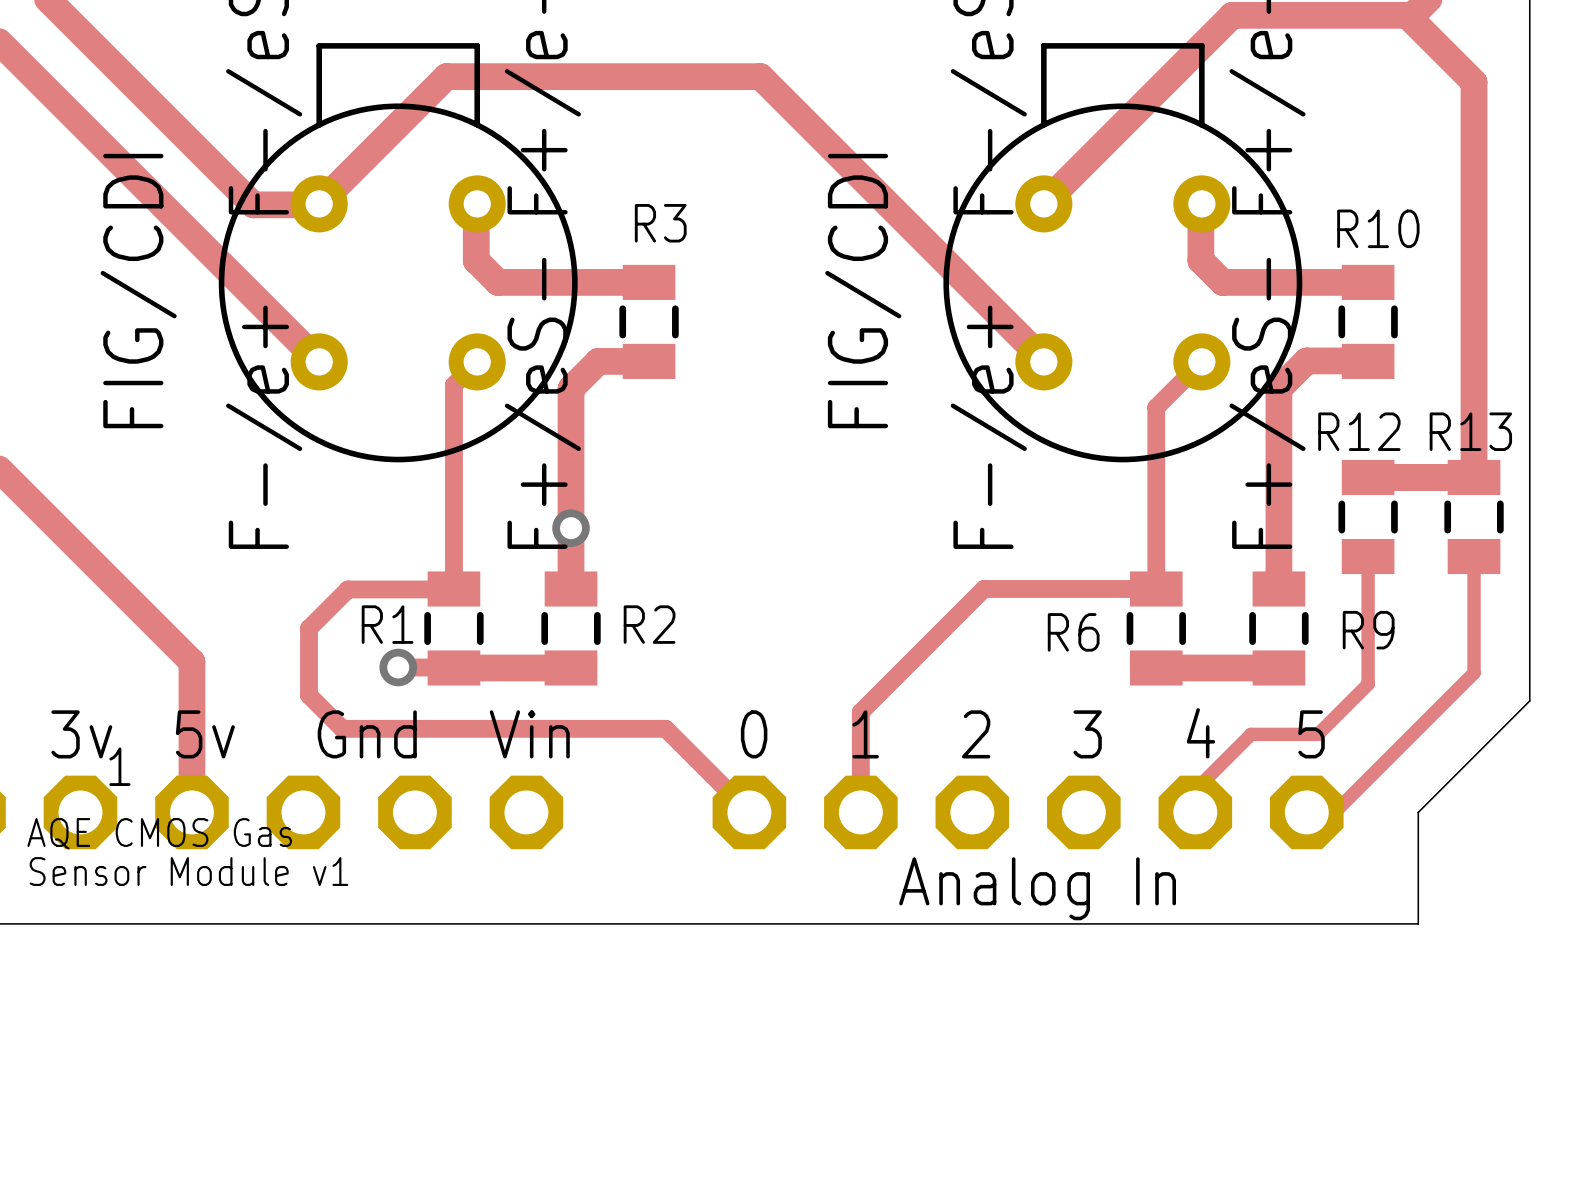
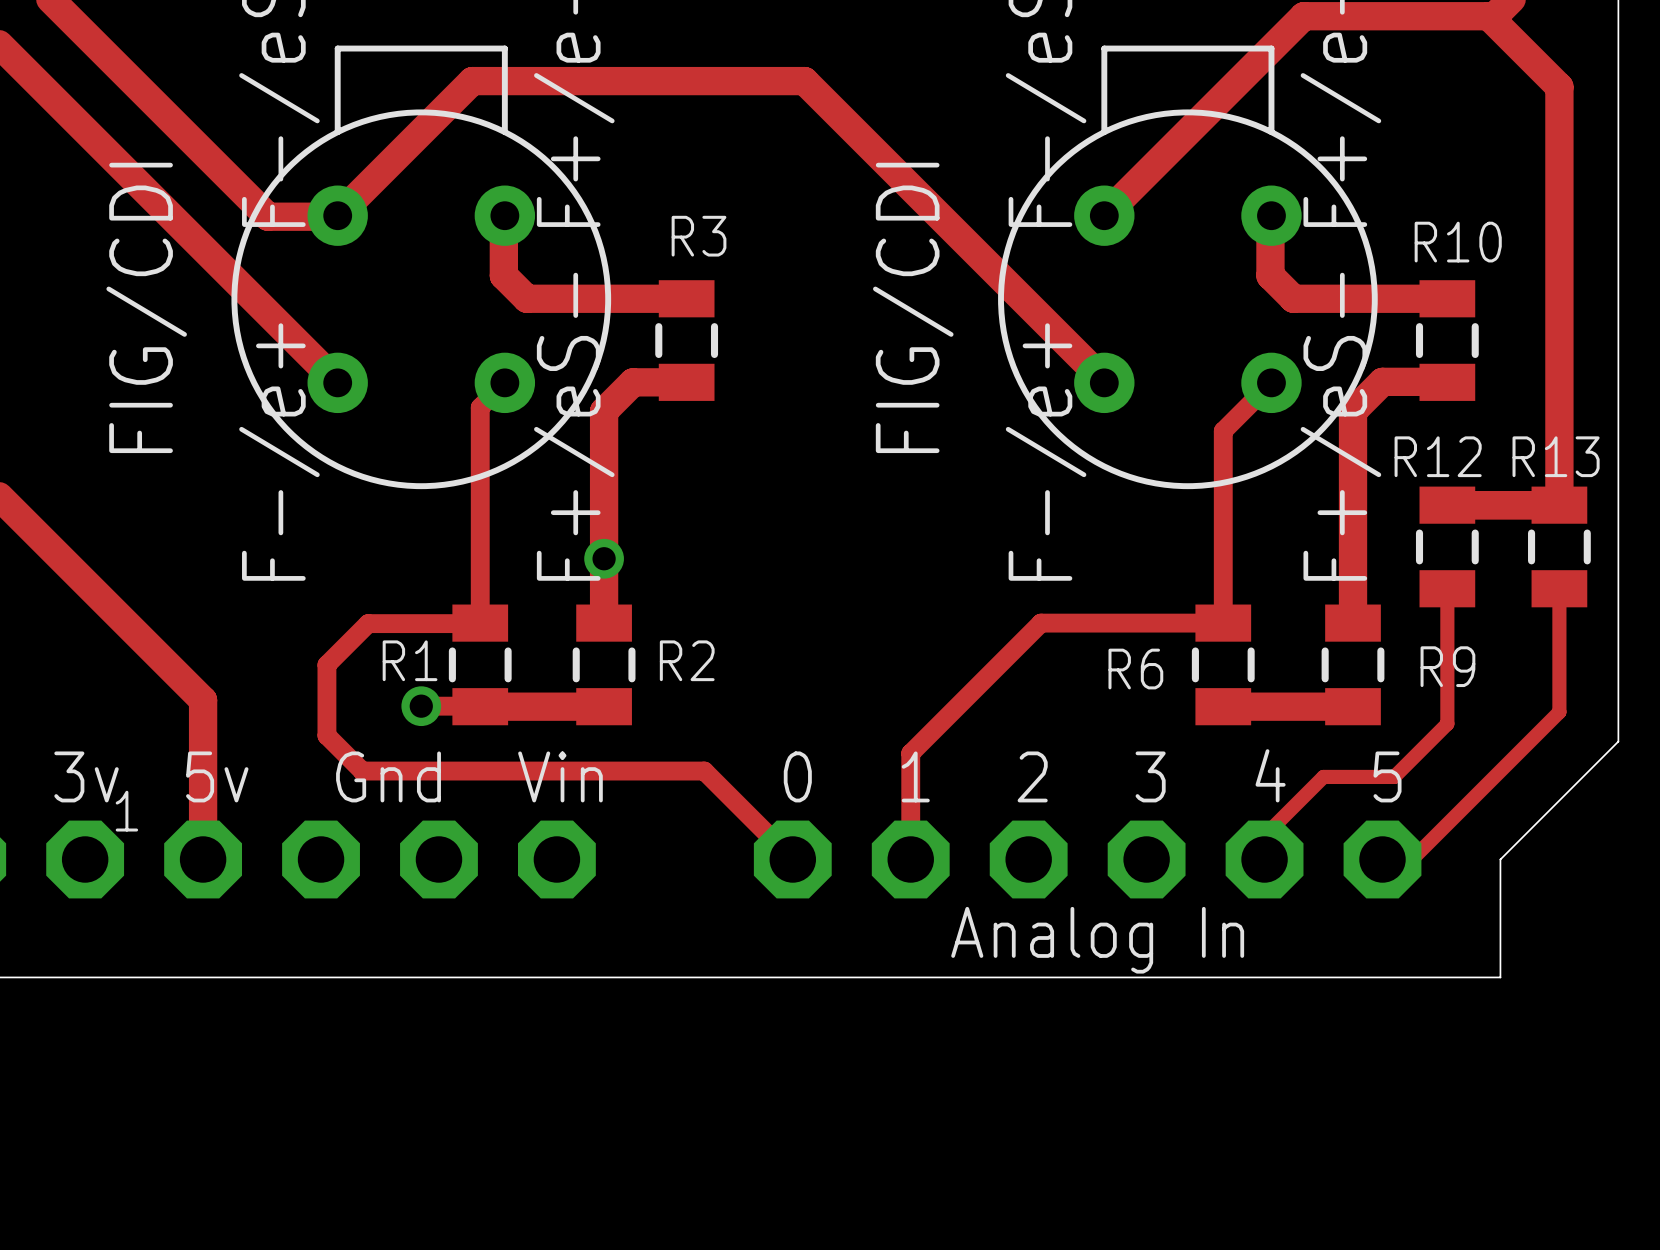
text: AQE CMOS Gas (159, 833) -> none
text: Sensor Module v1 (188, 871) -> none

